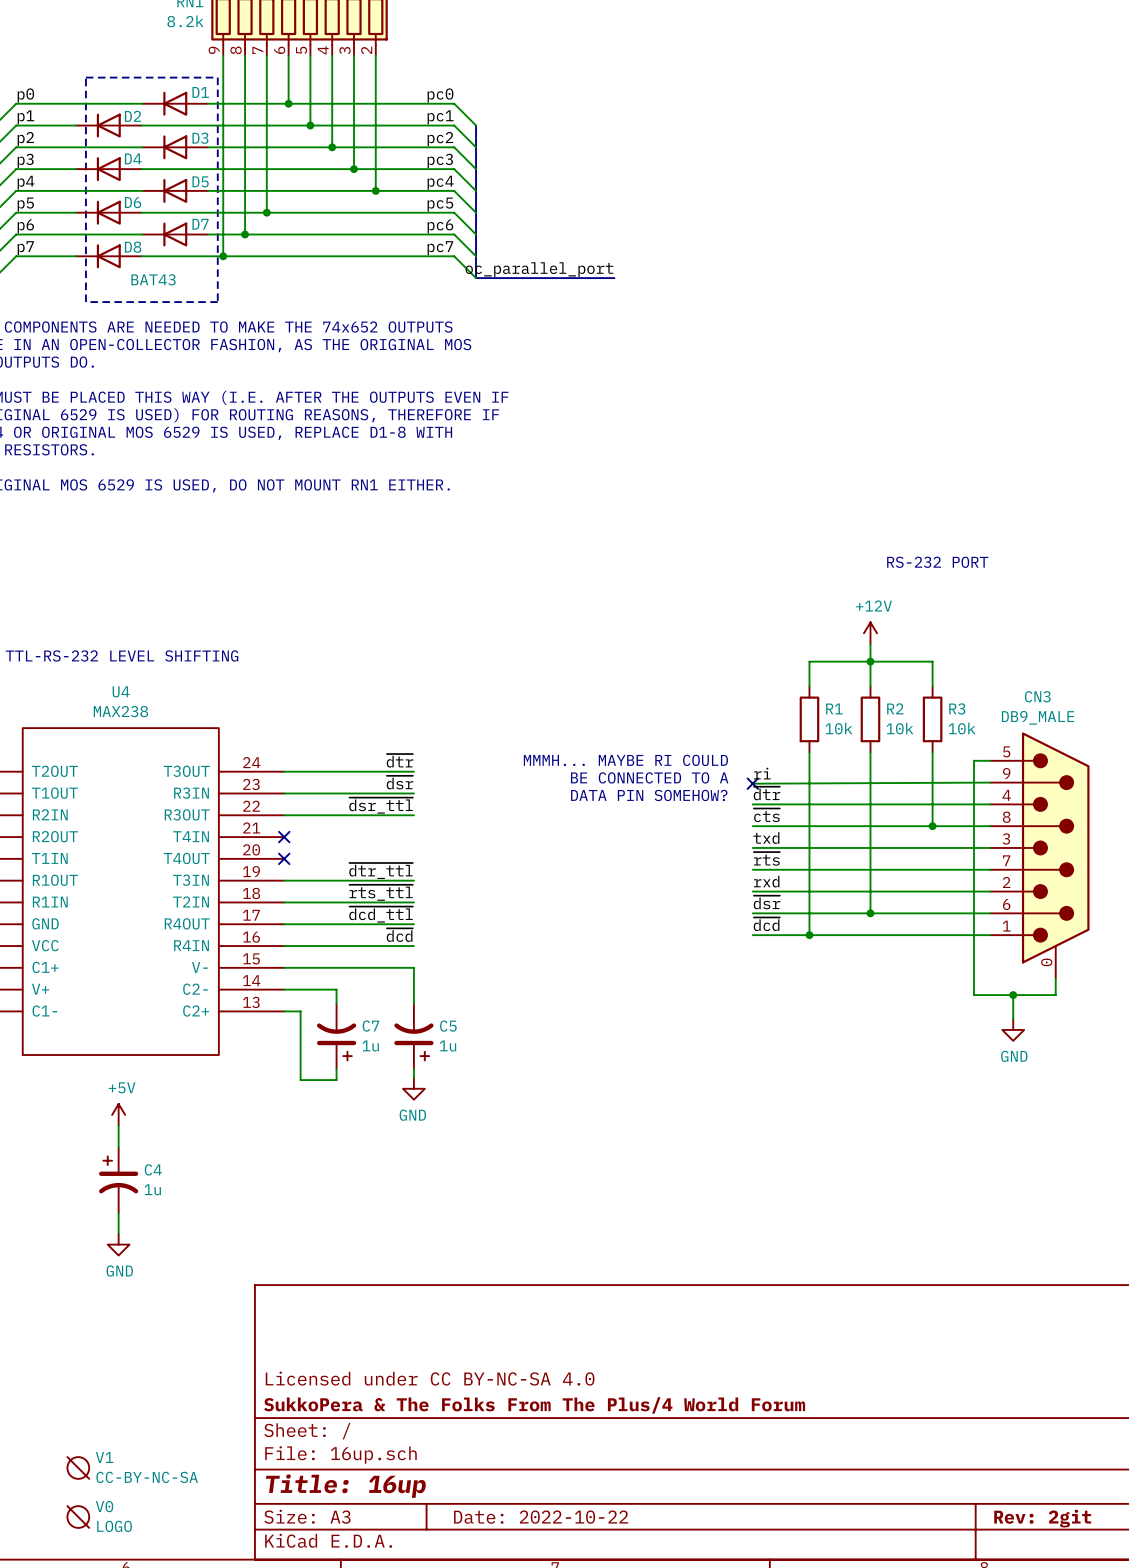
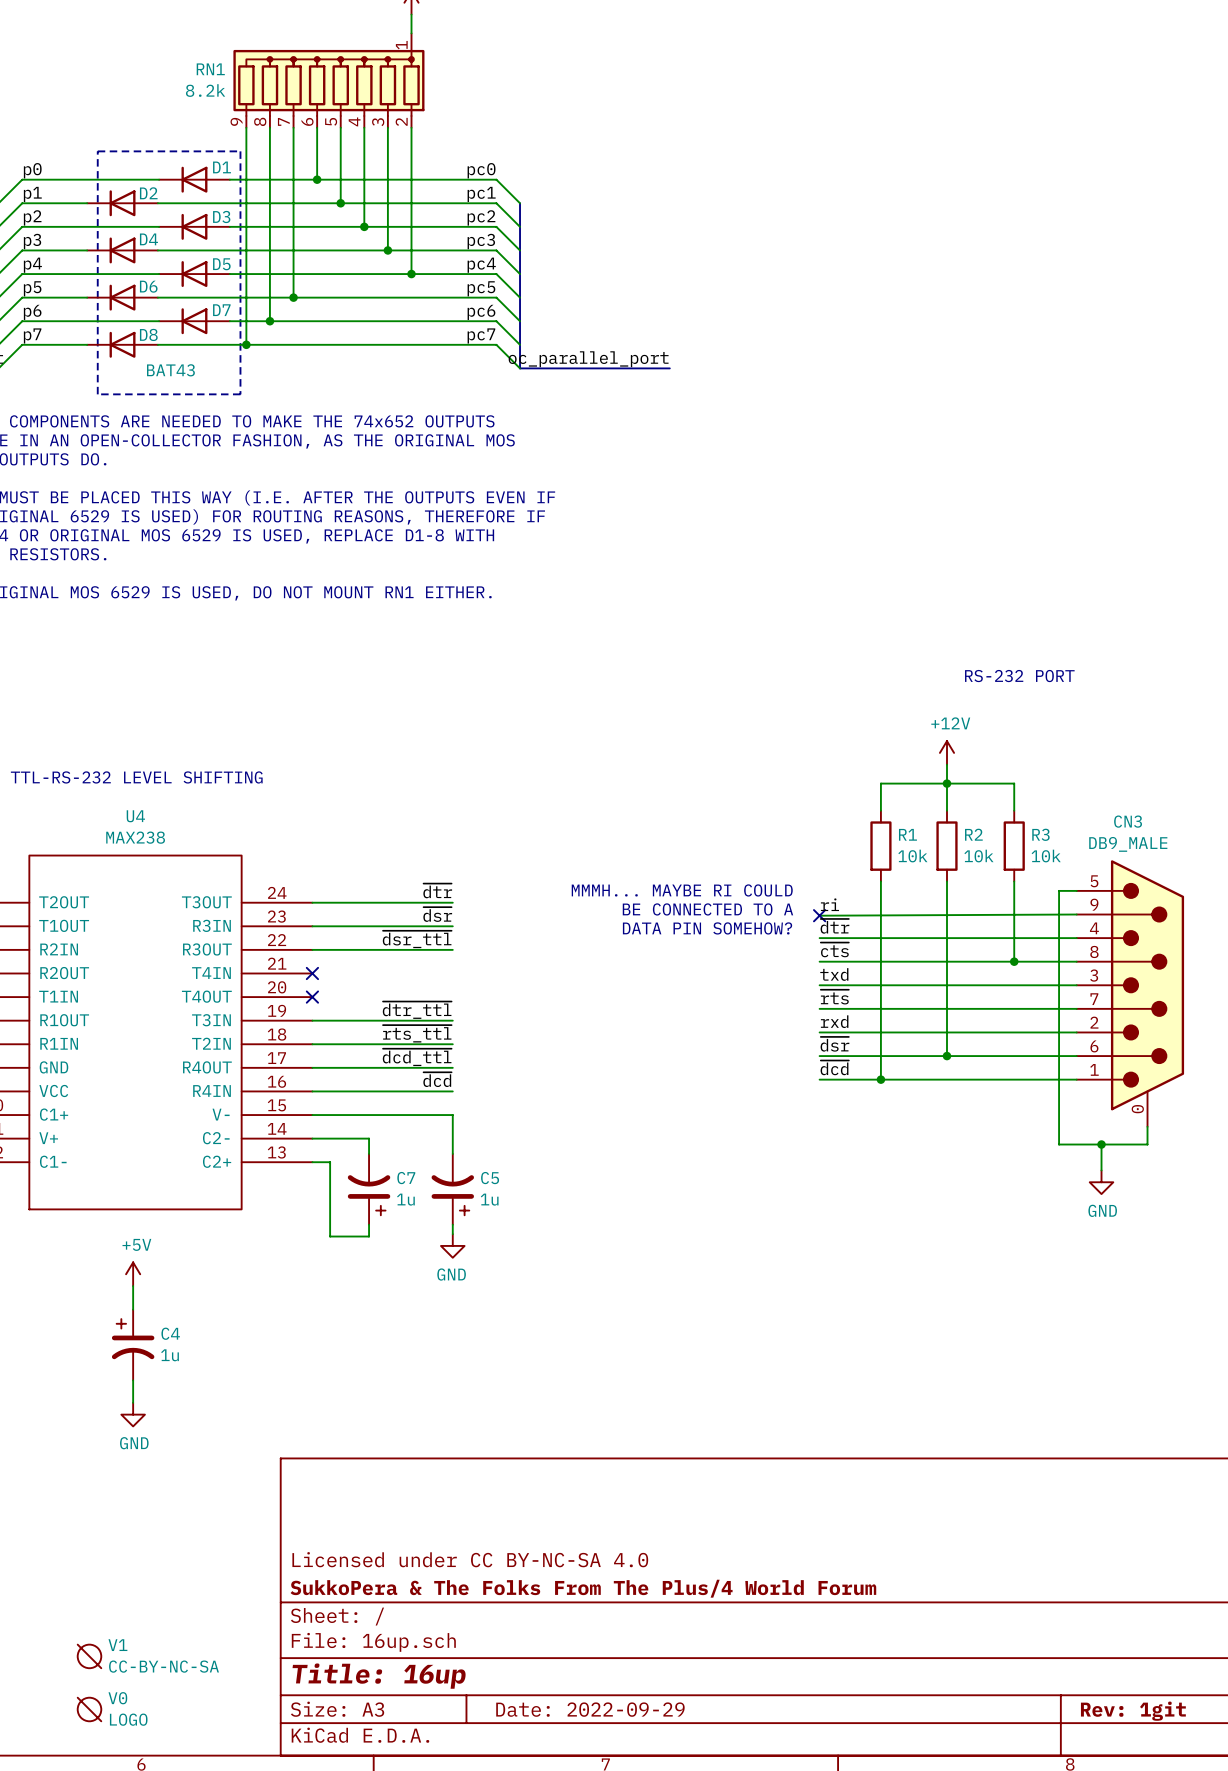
title block: Date: 2022-10-22 (541, 1517) -> Date: 2022-09-29 (590, 1709)
title block: Rev: 2git (1042, 1518) -> Rev: 1git (1133, 1711)

